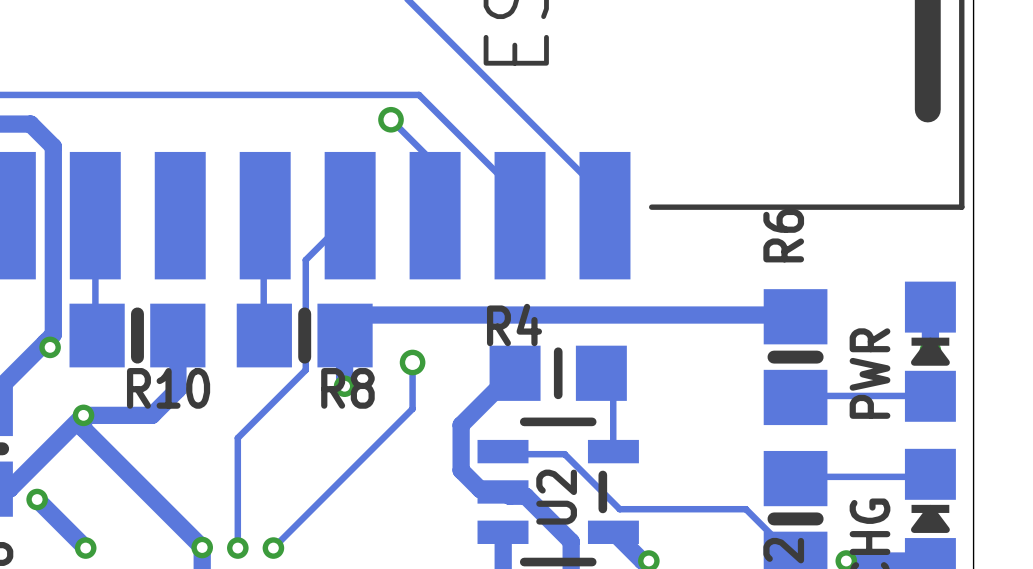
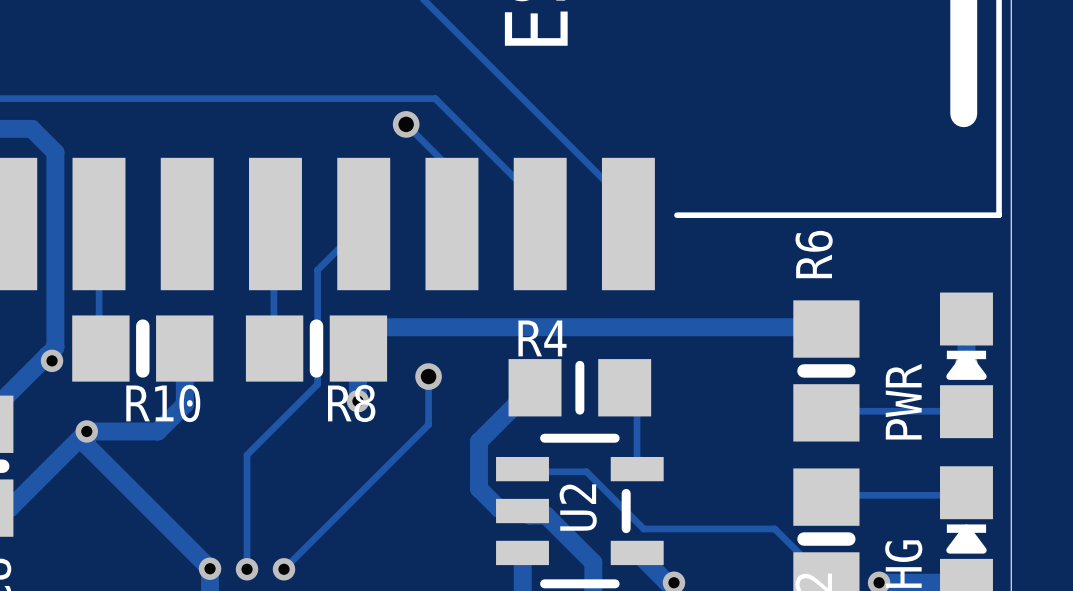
track: (37, 499) (85, 548) -> none
via: (37, 499) -> none
via: (85, 548) -> none

